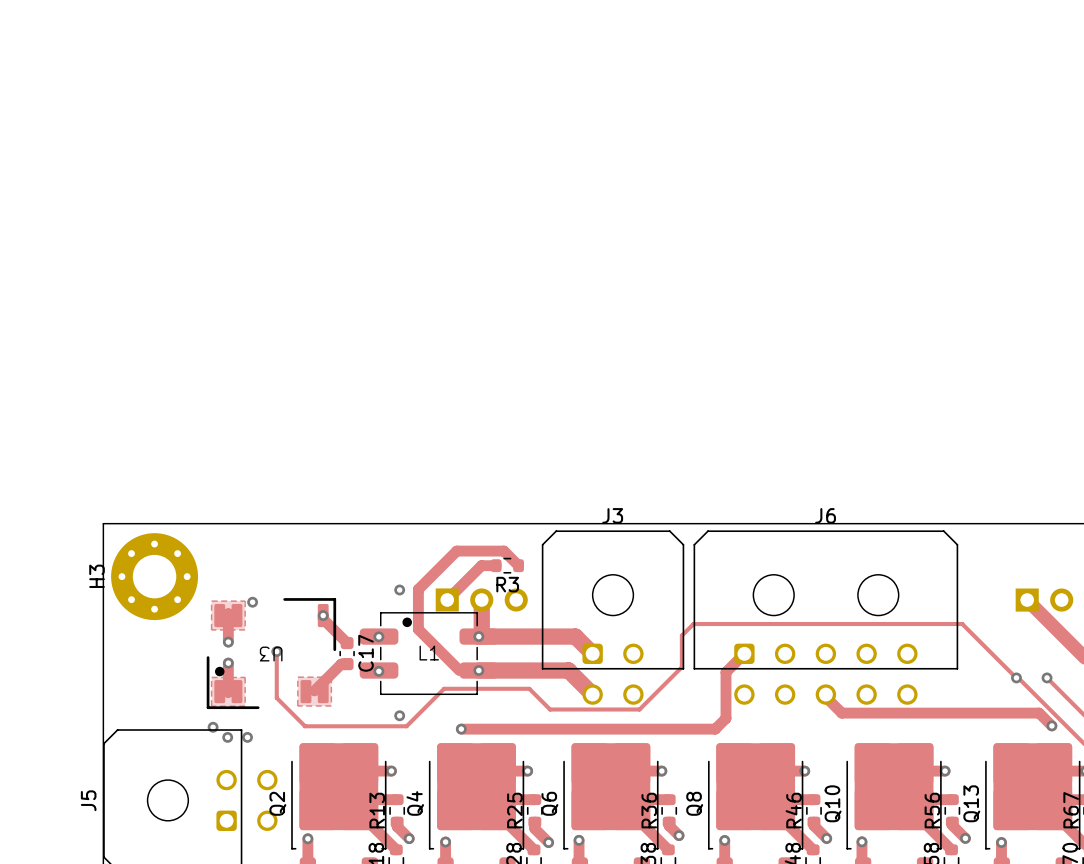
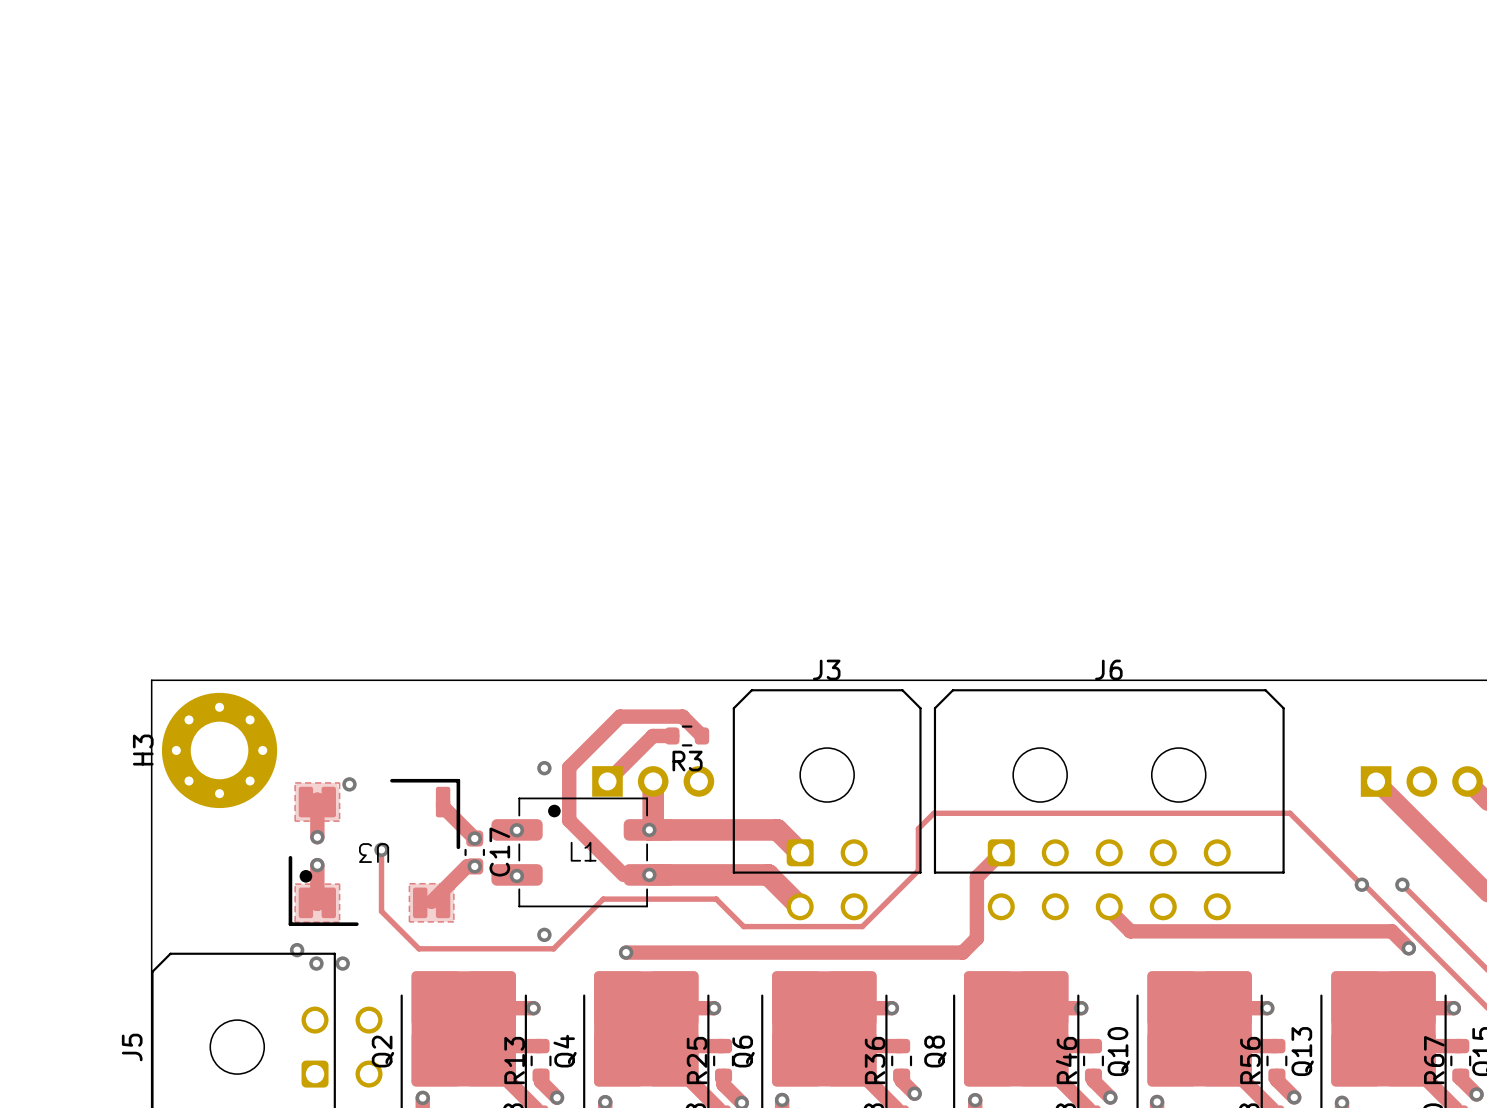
via: (323, 615) -> none
via: none -> (474, 838)
via: none -> (474, 866)

